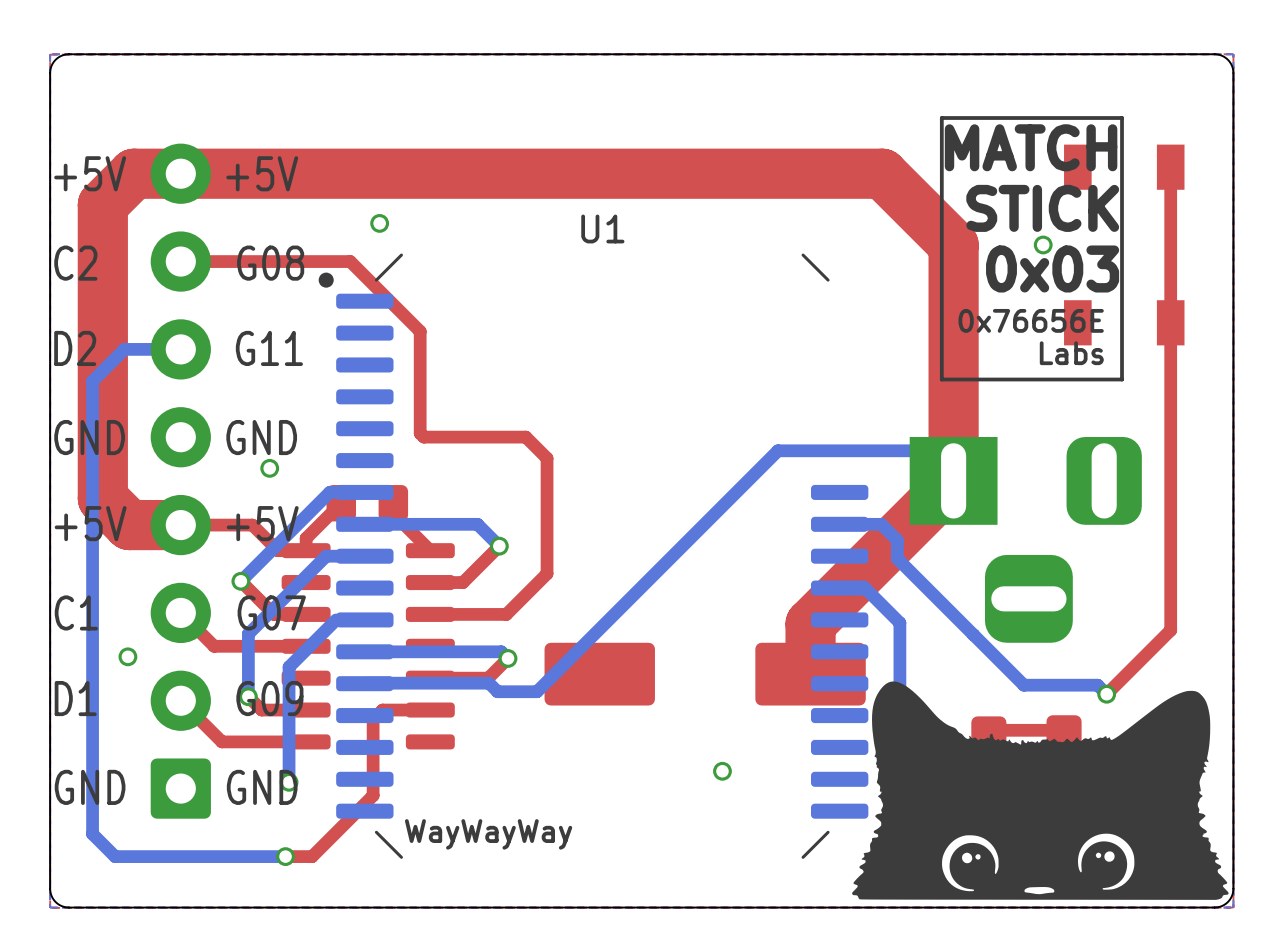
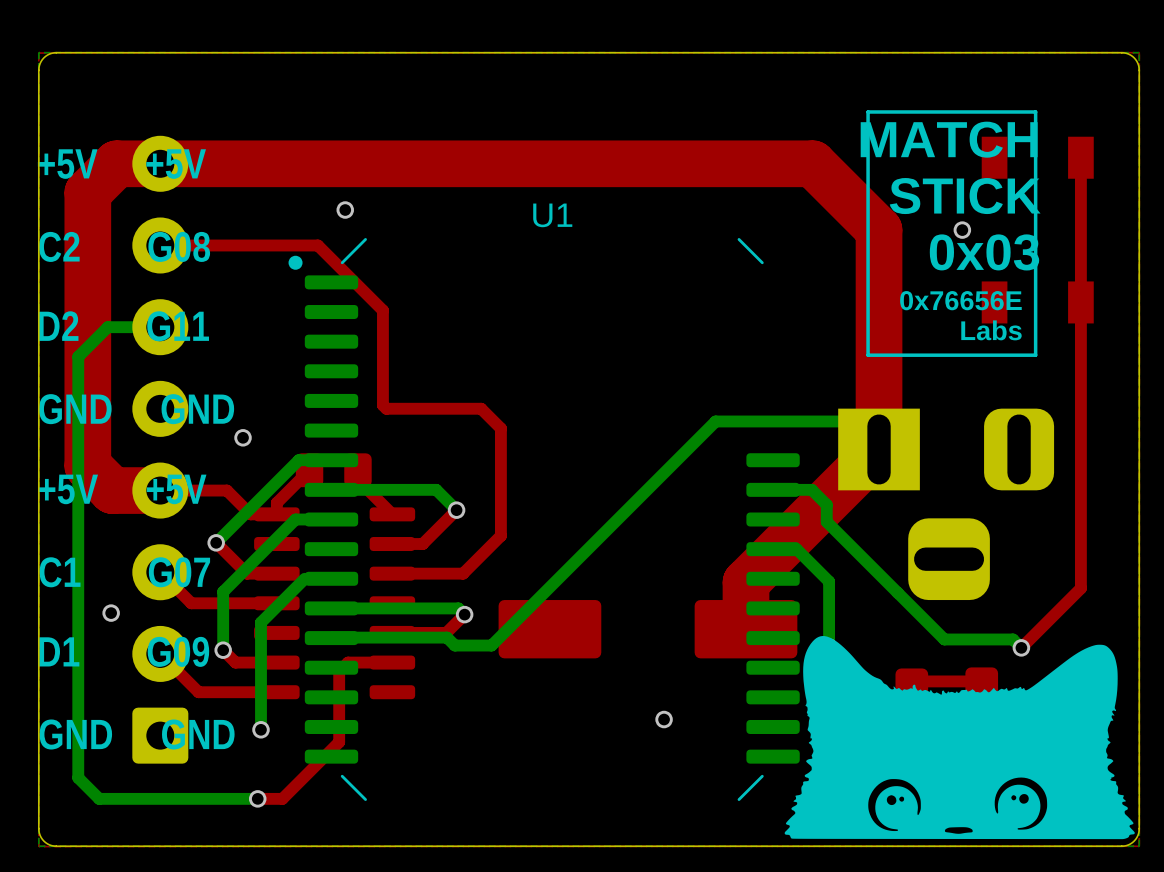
text: WayWayWay (488, 834) -> none

